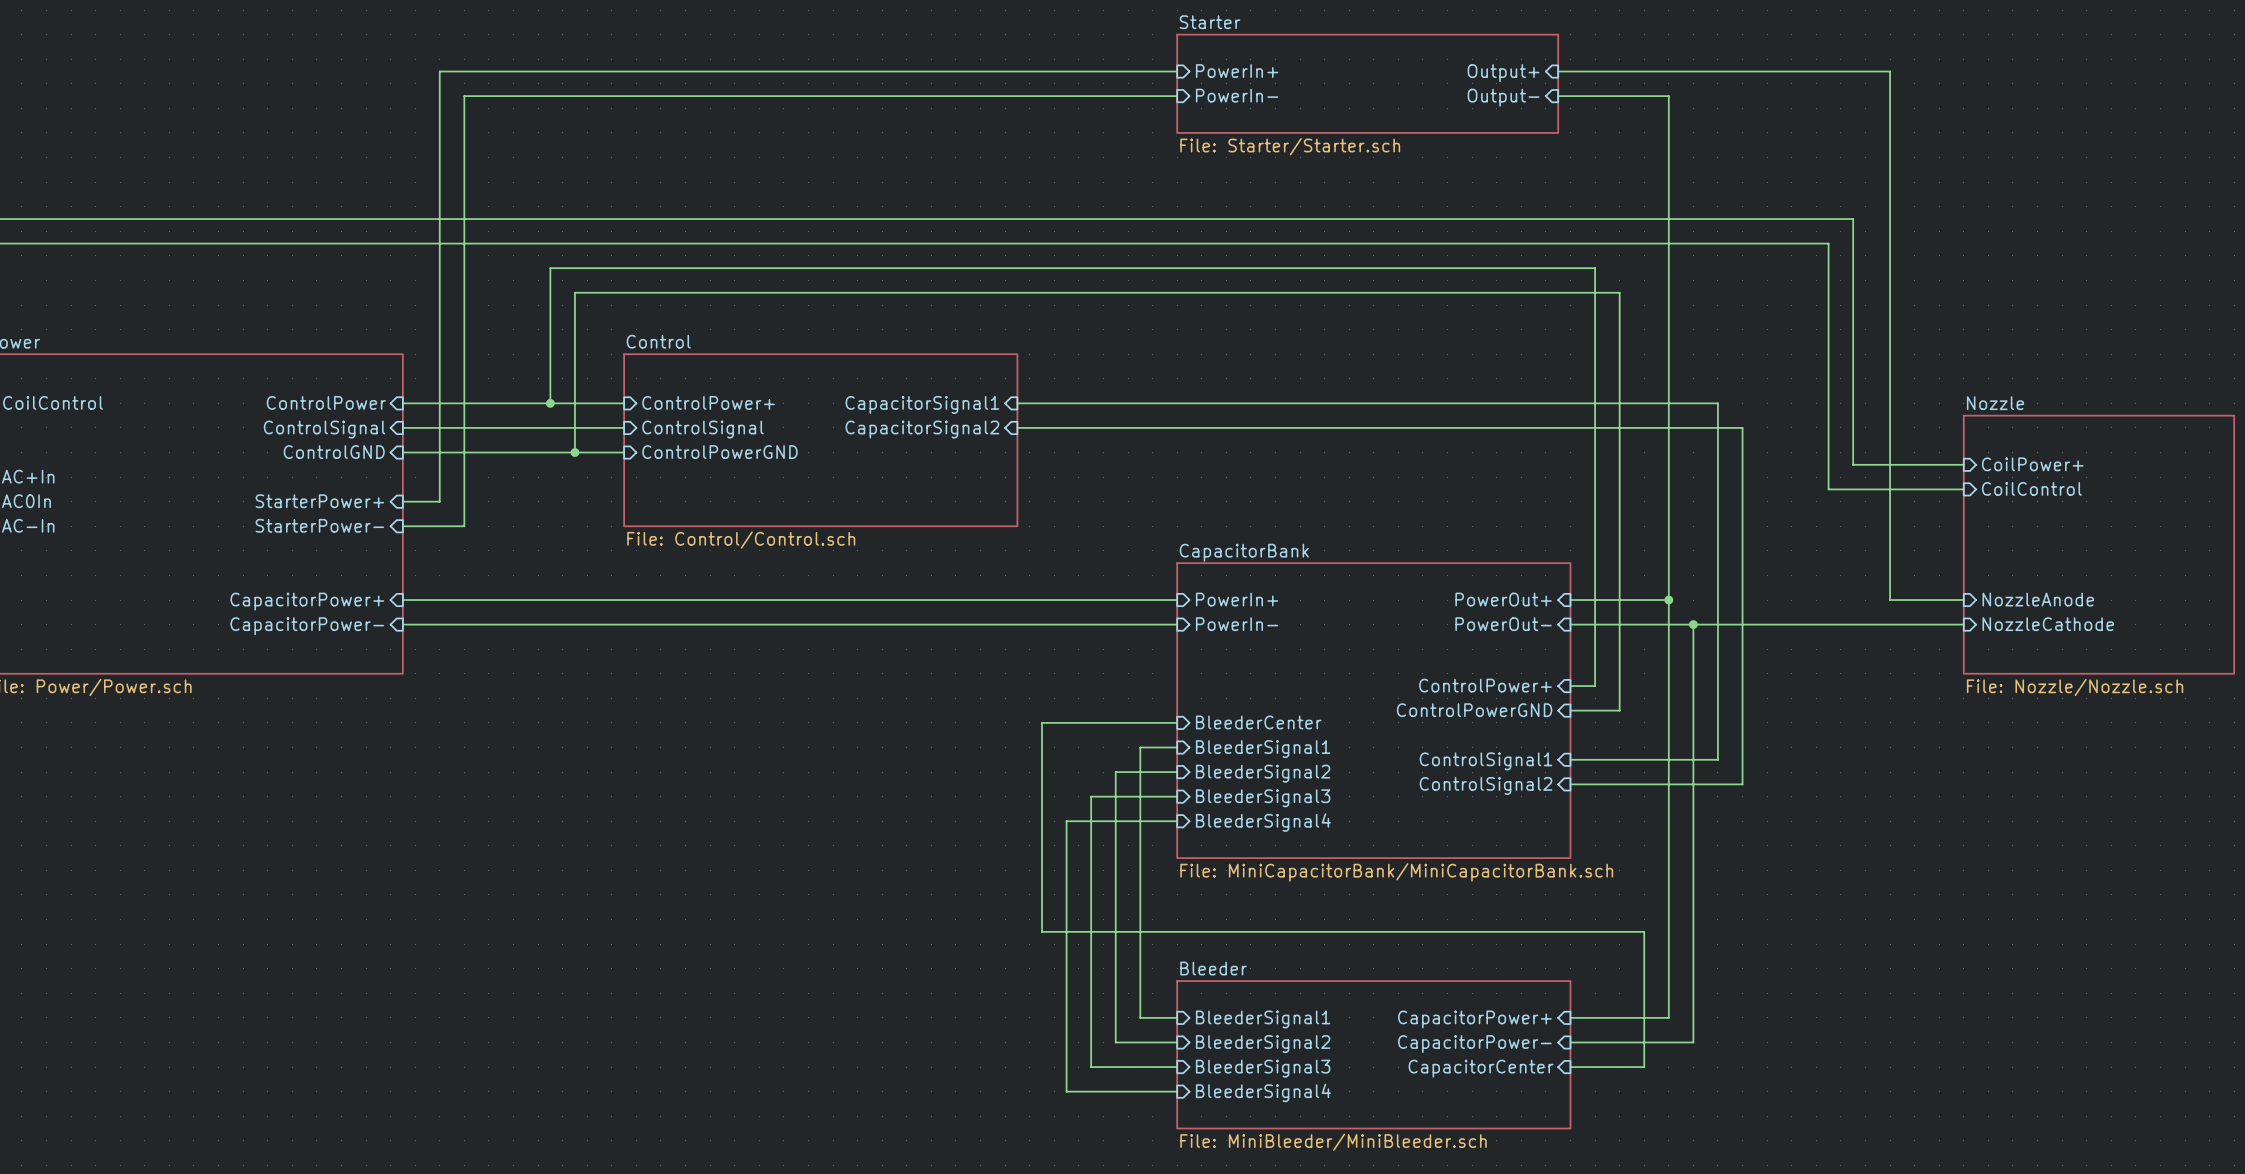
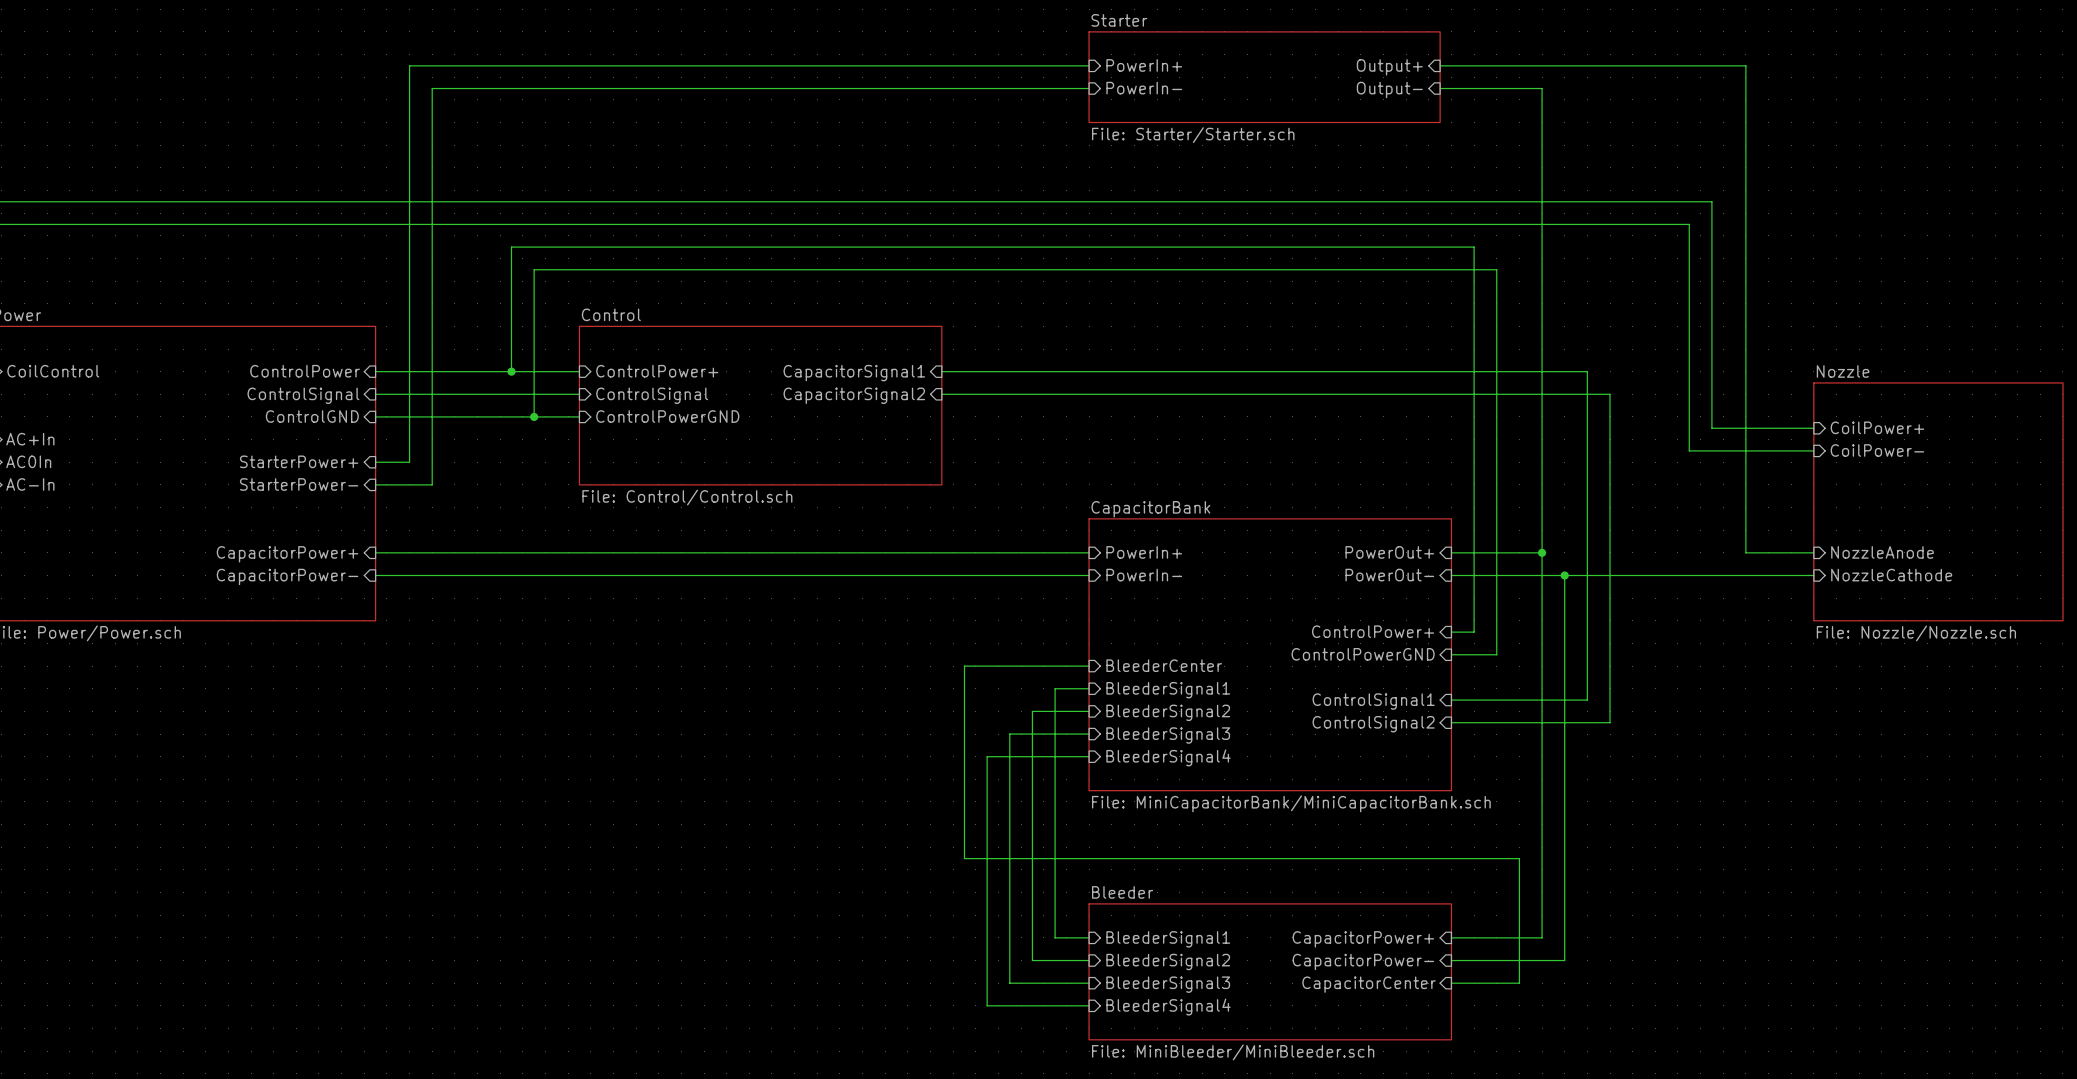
sheet pin: CoilControl (2031, 488) -> CoilPower- (1877, 450)

